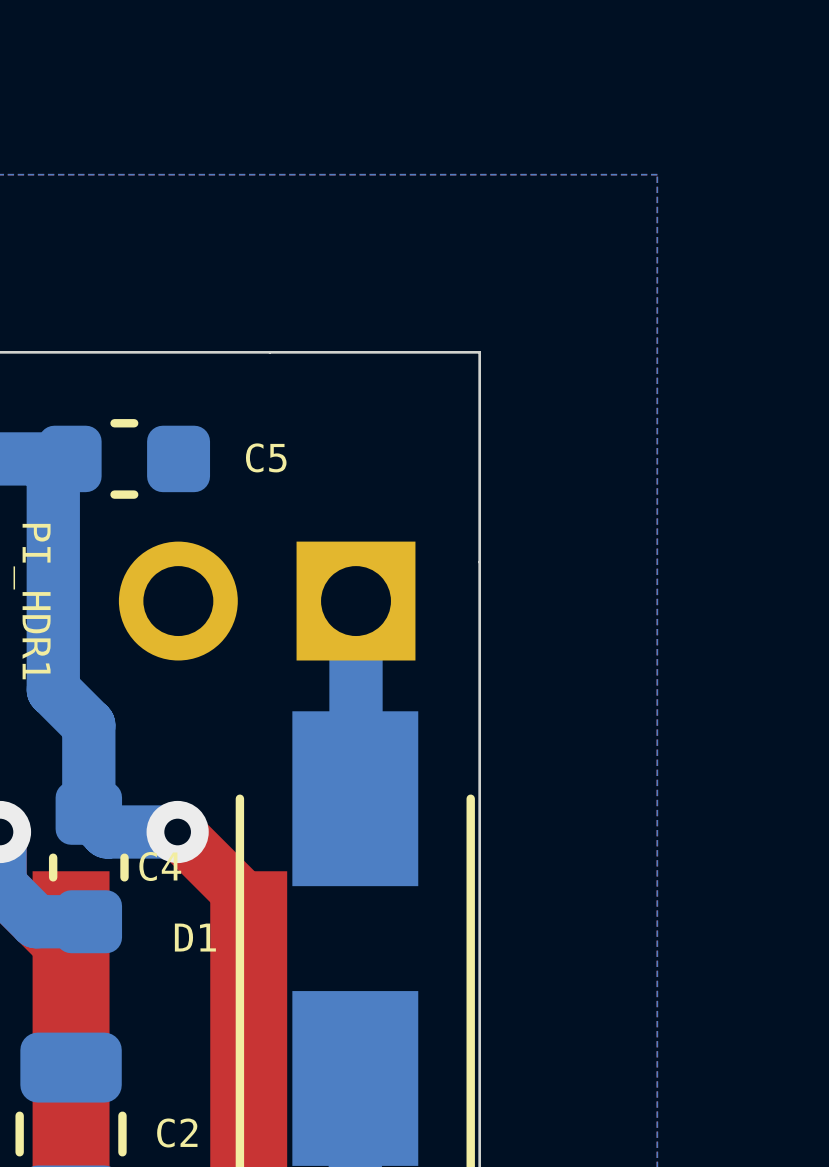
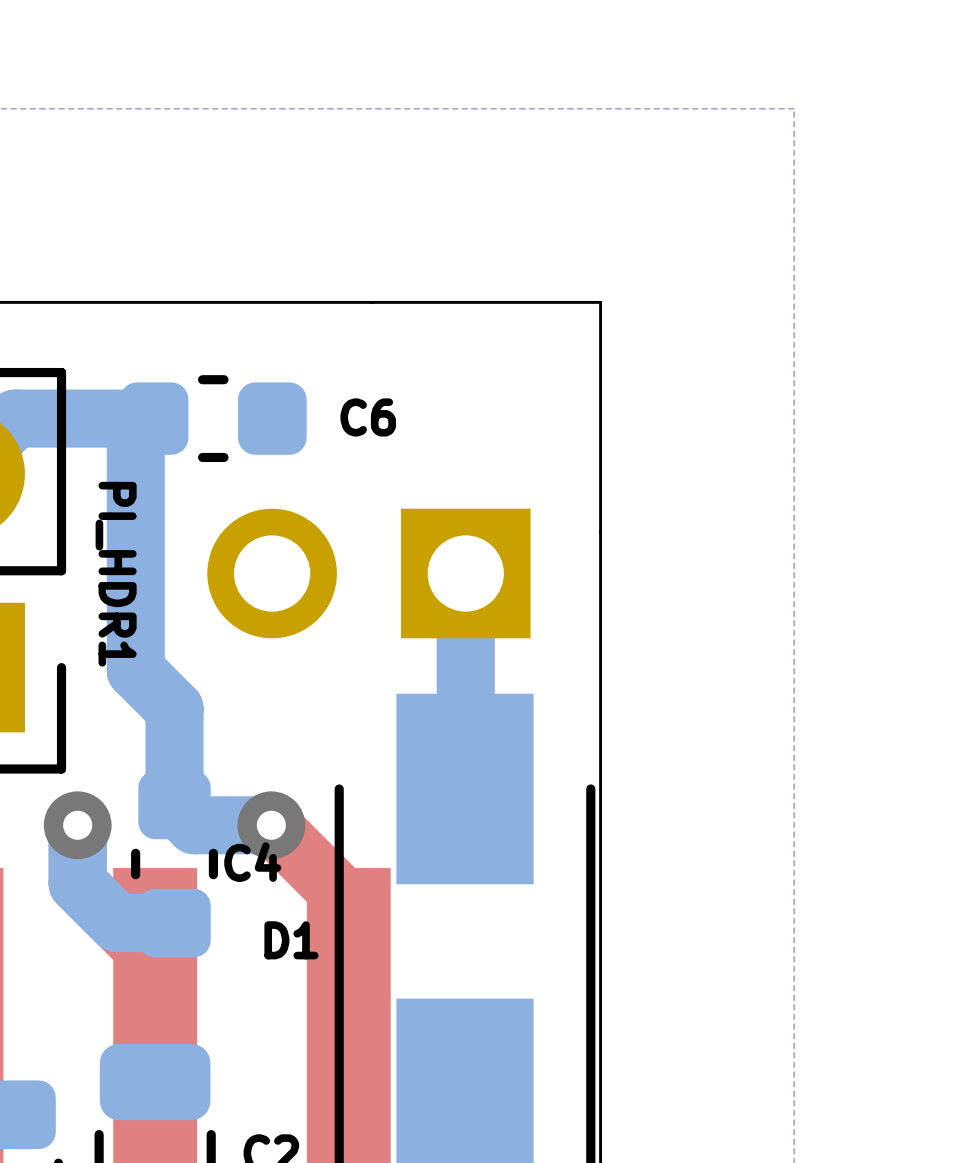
C5 name: C5 (266, 457) -> C6 (368, 417)

